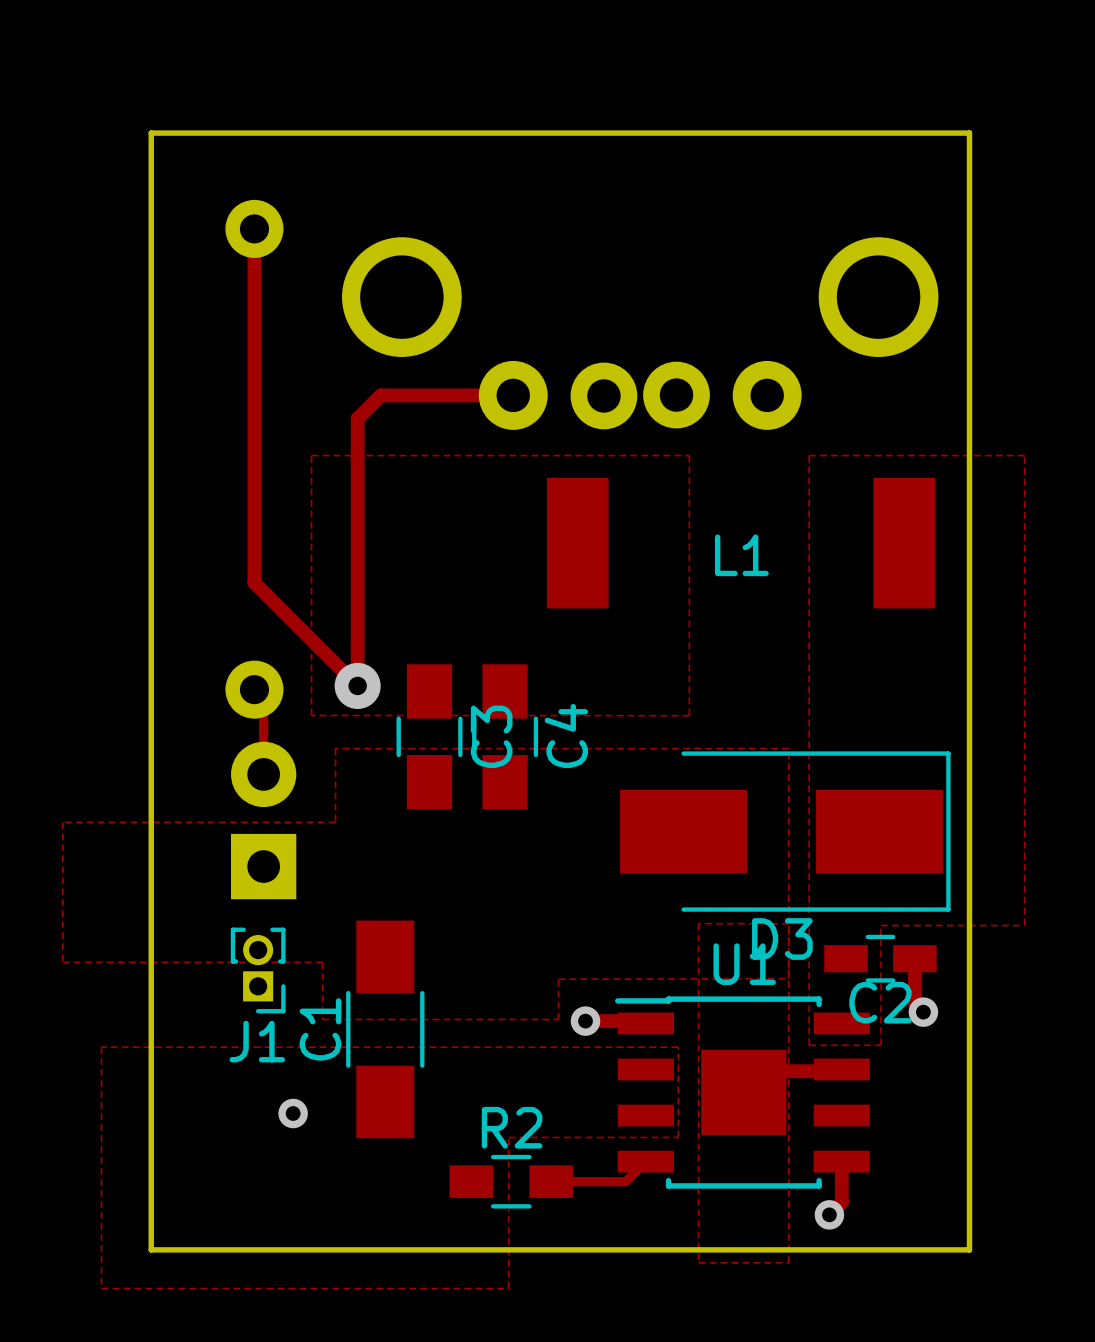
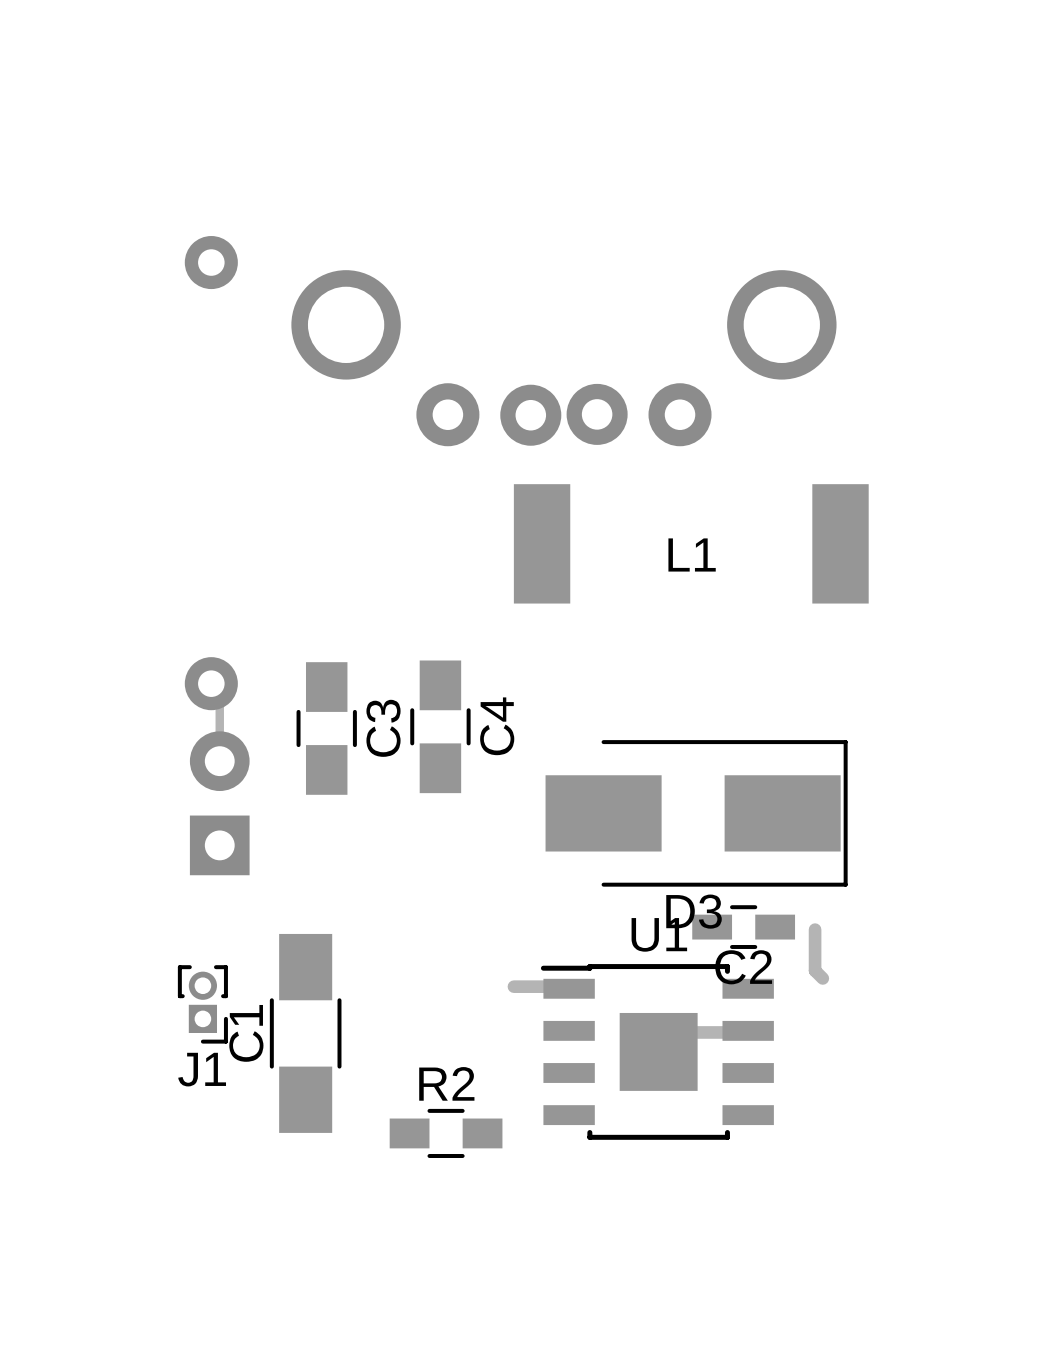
board edge: (151, 133) (151, 1249) (969, 1249) (969, 133) (151, 133) -> none
track: (254, 228) (254, 582) (357, 685) (357, 418) (380, 395) (513, 395) -> none
zone outline: (311, 455) (689, 455) (689, 715) (311, 715) (311, 455) -> none
zone outline: (809, 455) (1024, 455) (1024, 925) (881, 925) (881, 1045) (809, 1045) (809, 455) -> none
L1 position: (740, 543) -> (691, 543)
via: (357, 685) -> none
C3 position: (429, 736) -> (326, 728)
zone outline: (788, 923) (698, 923) (698, 1262) (788, 1262) (788, 748) (335, 748) (335, 822) (62, 822) (62, 962) (322, 962) (322, 1019) (558, 1019) (558, 979) (788, 978) -> none
J1 footprint: [230, 927, 286, 1014] -> [177, 965, 228, 1044]
C2 position: (880, 958) -> (743, 927)
via: (923, 1012) -> none
via: (585, 1021) -> none
C1 position: (385, 1029) -> (305, 1033)
zone outline: (101, 1047) (678, 1047) (678, 1137) (508, 1137) (508, 1288) (101, 1288) (101, 1047) -> none
via: (293, 1113) -> none
track: (645, 1161) (625, 1181) (551, 1181) -> none
track: (841, 1161) (841, 1202) (829, 1214) -> none
via: (829, 1214) -> none

